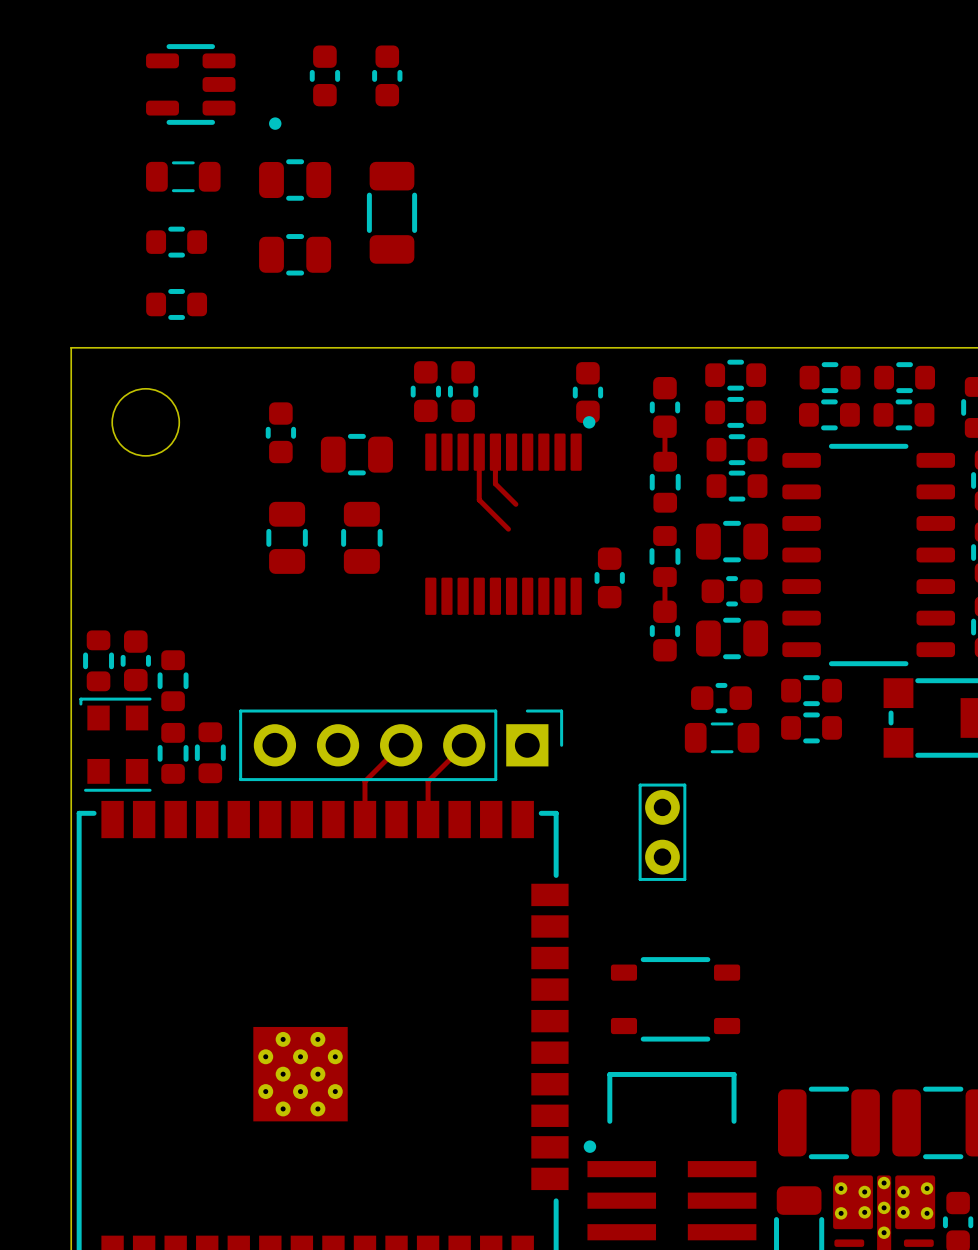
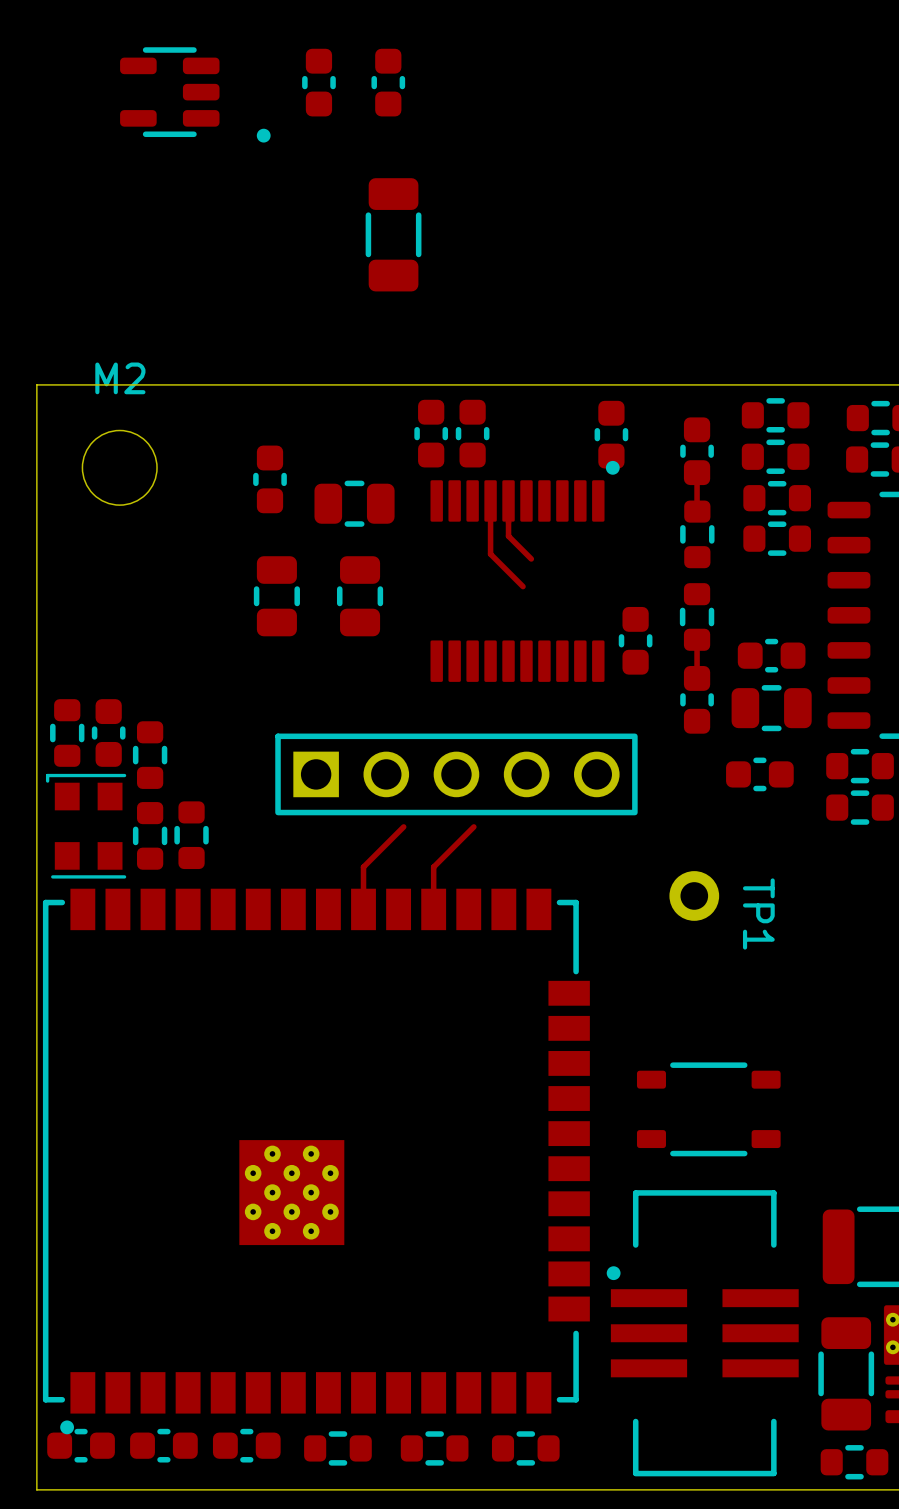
part: (183, 176) -> none
part: (295, 180) -> none
part: (176, 242) -> none
part: (295, 254) -> none
part: (176, 304) -> none
M2 name: none -> M2 (120, 378)
part: (732, 541) -> none
part: none -> (456, 774)
part: (722, 737) -> none
part: (401, 745) -> none
TP1: none -> (694, 895)
part: (662, 832) -> none

